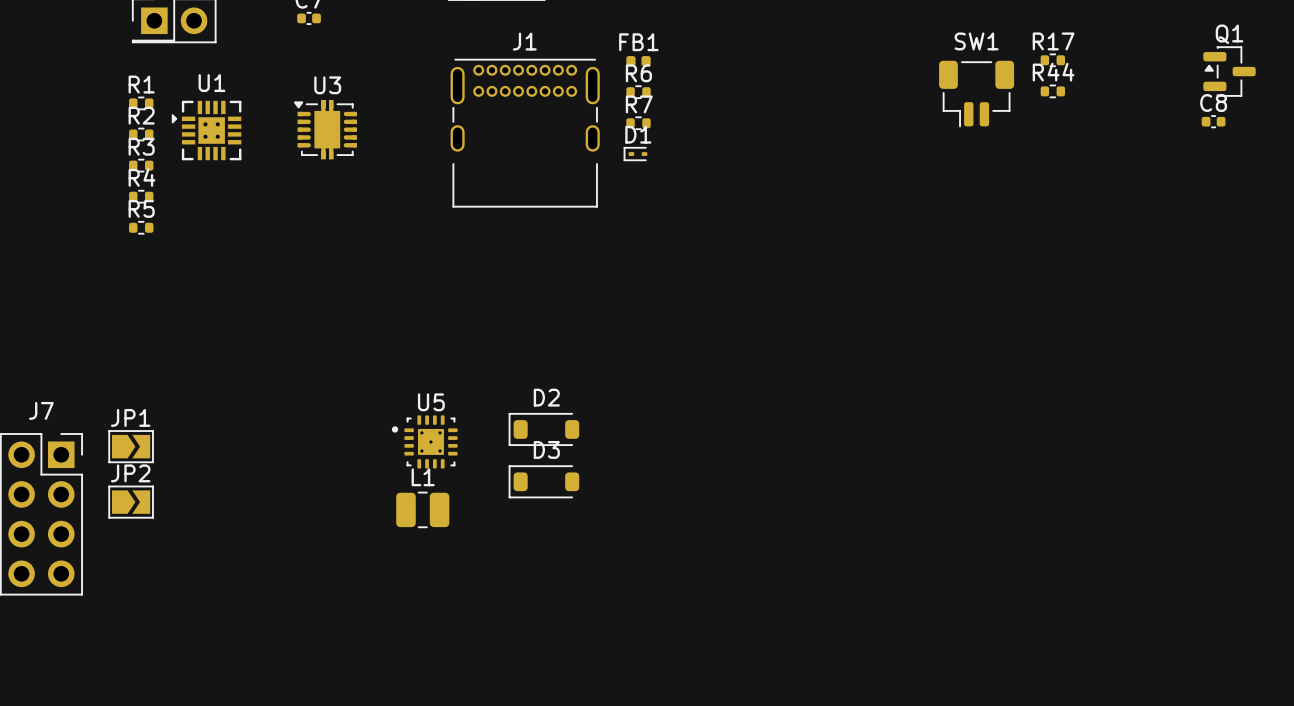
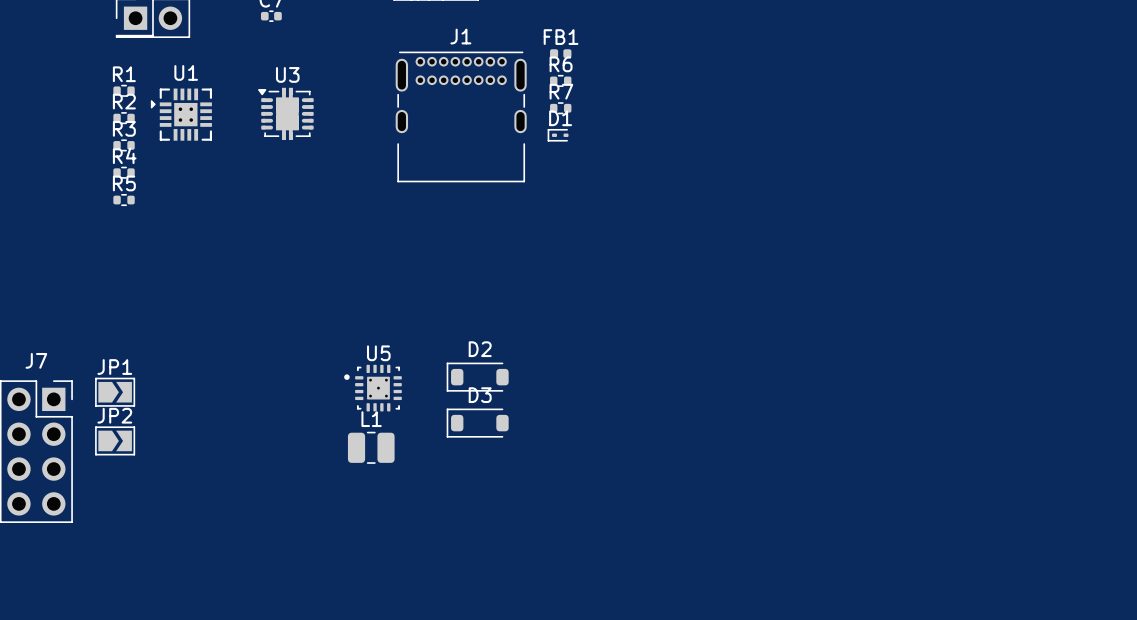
R17: (1052, 60) -> none
Q1: (1229, 71) -> none
R44: (1052, 91) -> none
SW1: (976, 94) -> none
C8: (1213, 121) -> none

